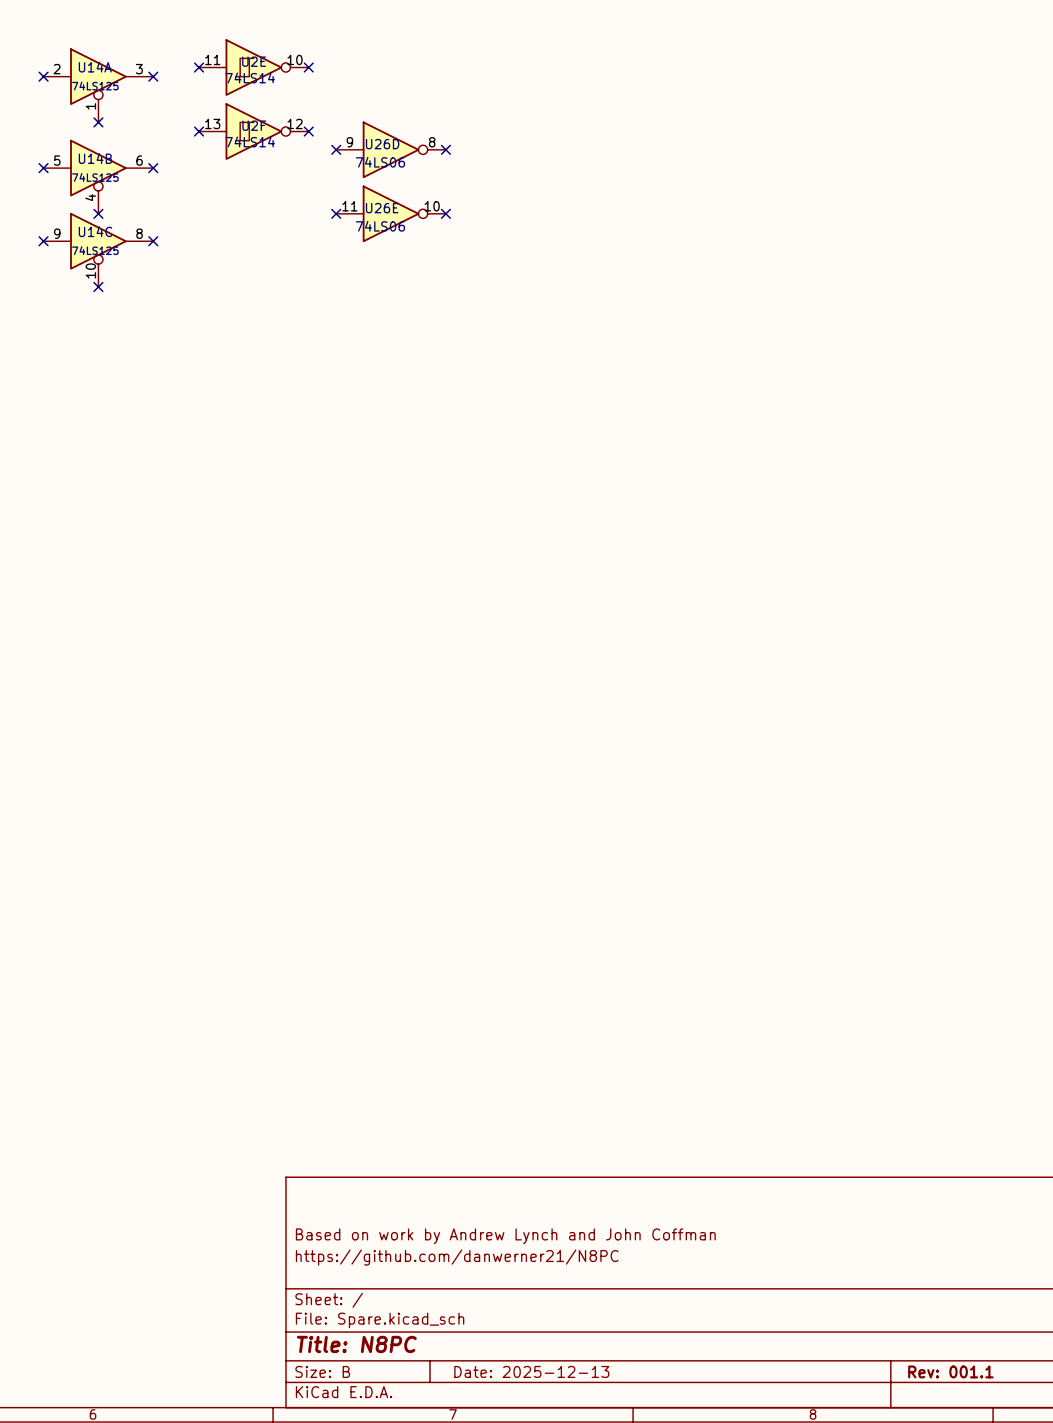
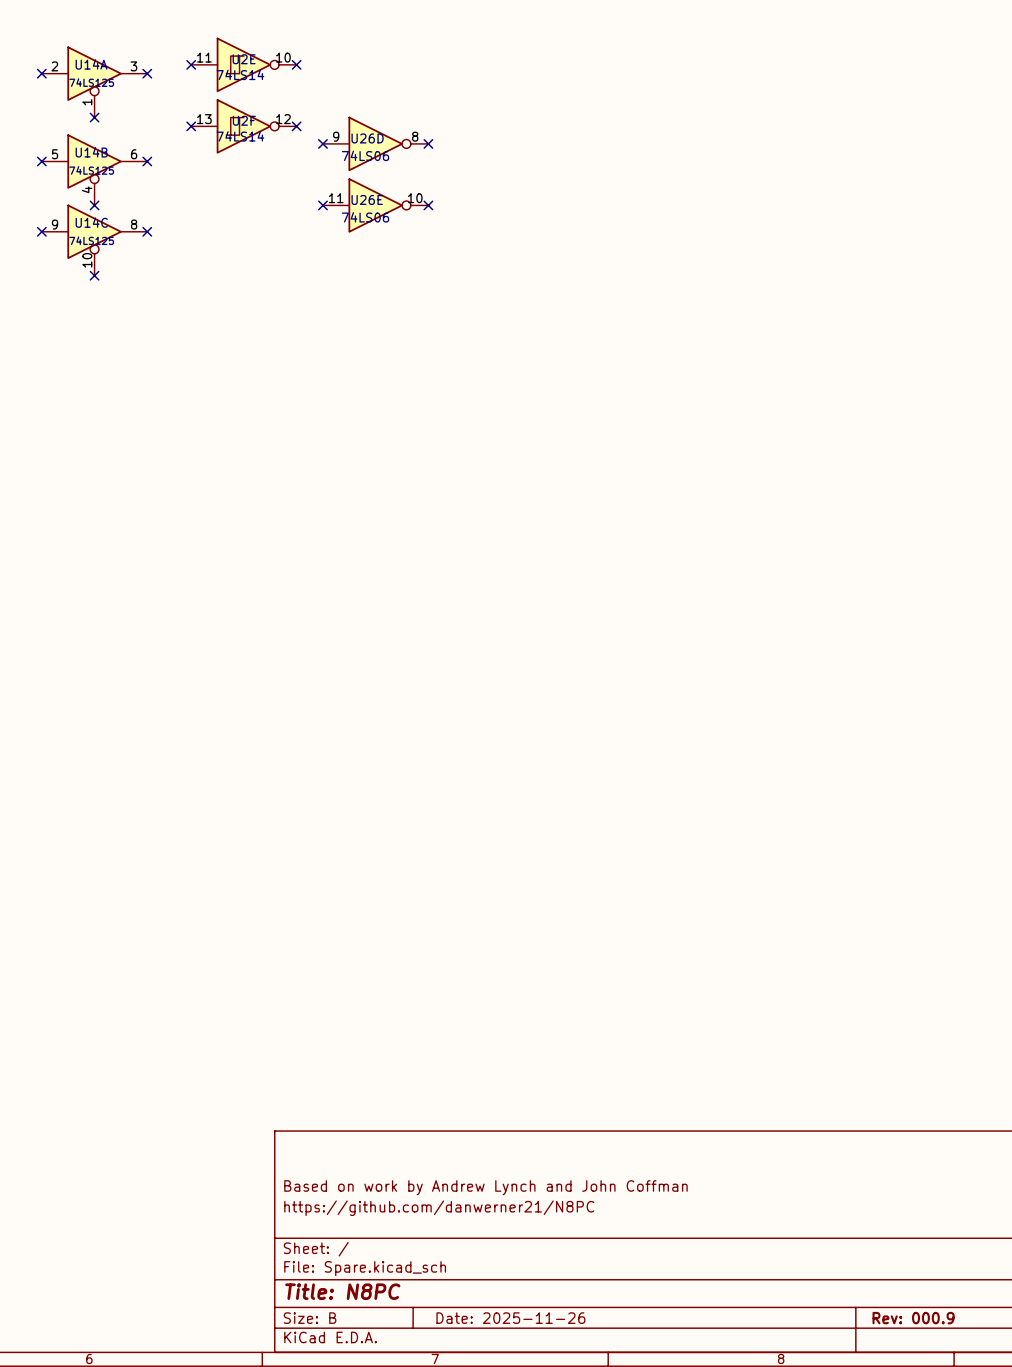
title block: Date: 2025-12-13 (531, 1371) -> Date: 2025-11-26 (510, 1318)
title block: Rev: 001.1 (950, 1371) -> Rev: 000.9 (913, 1318)

